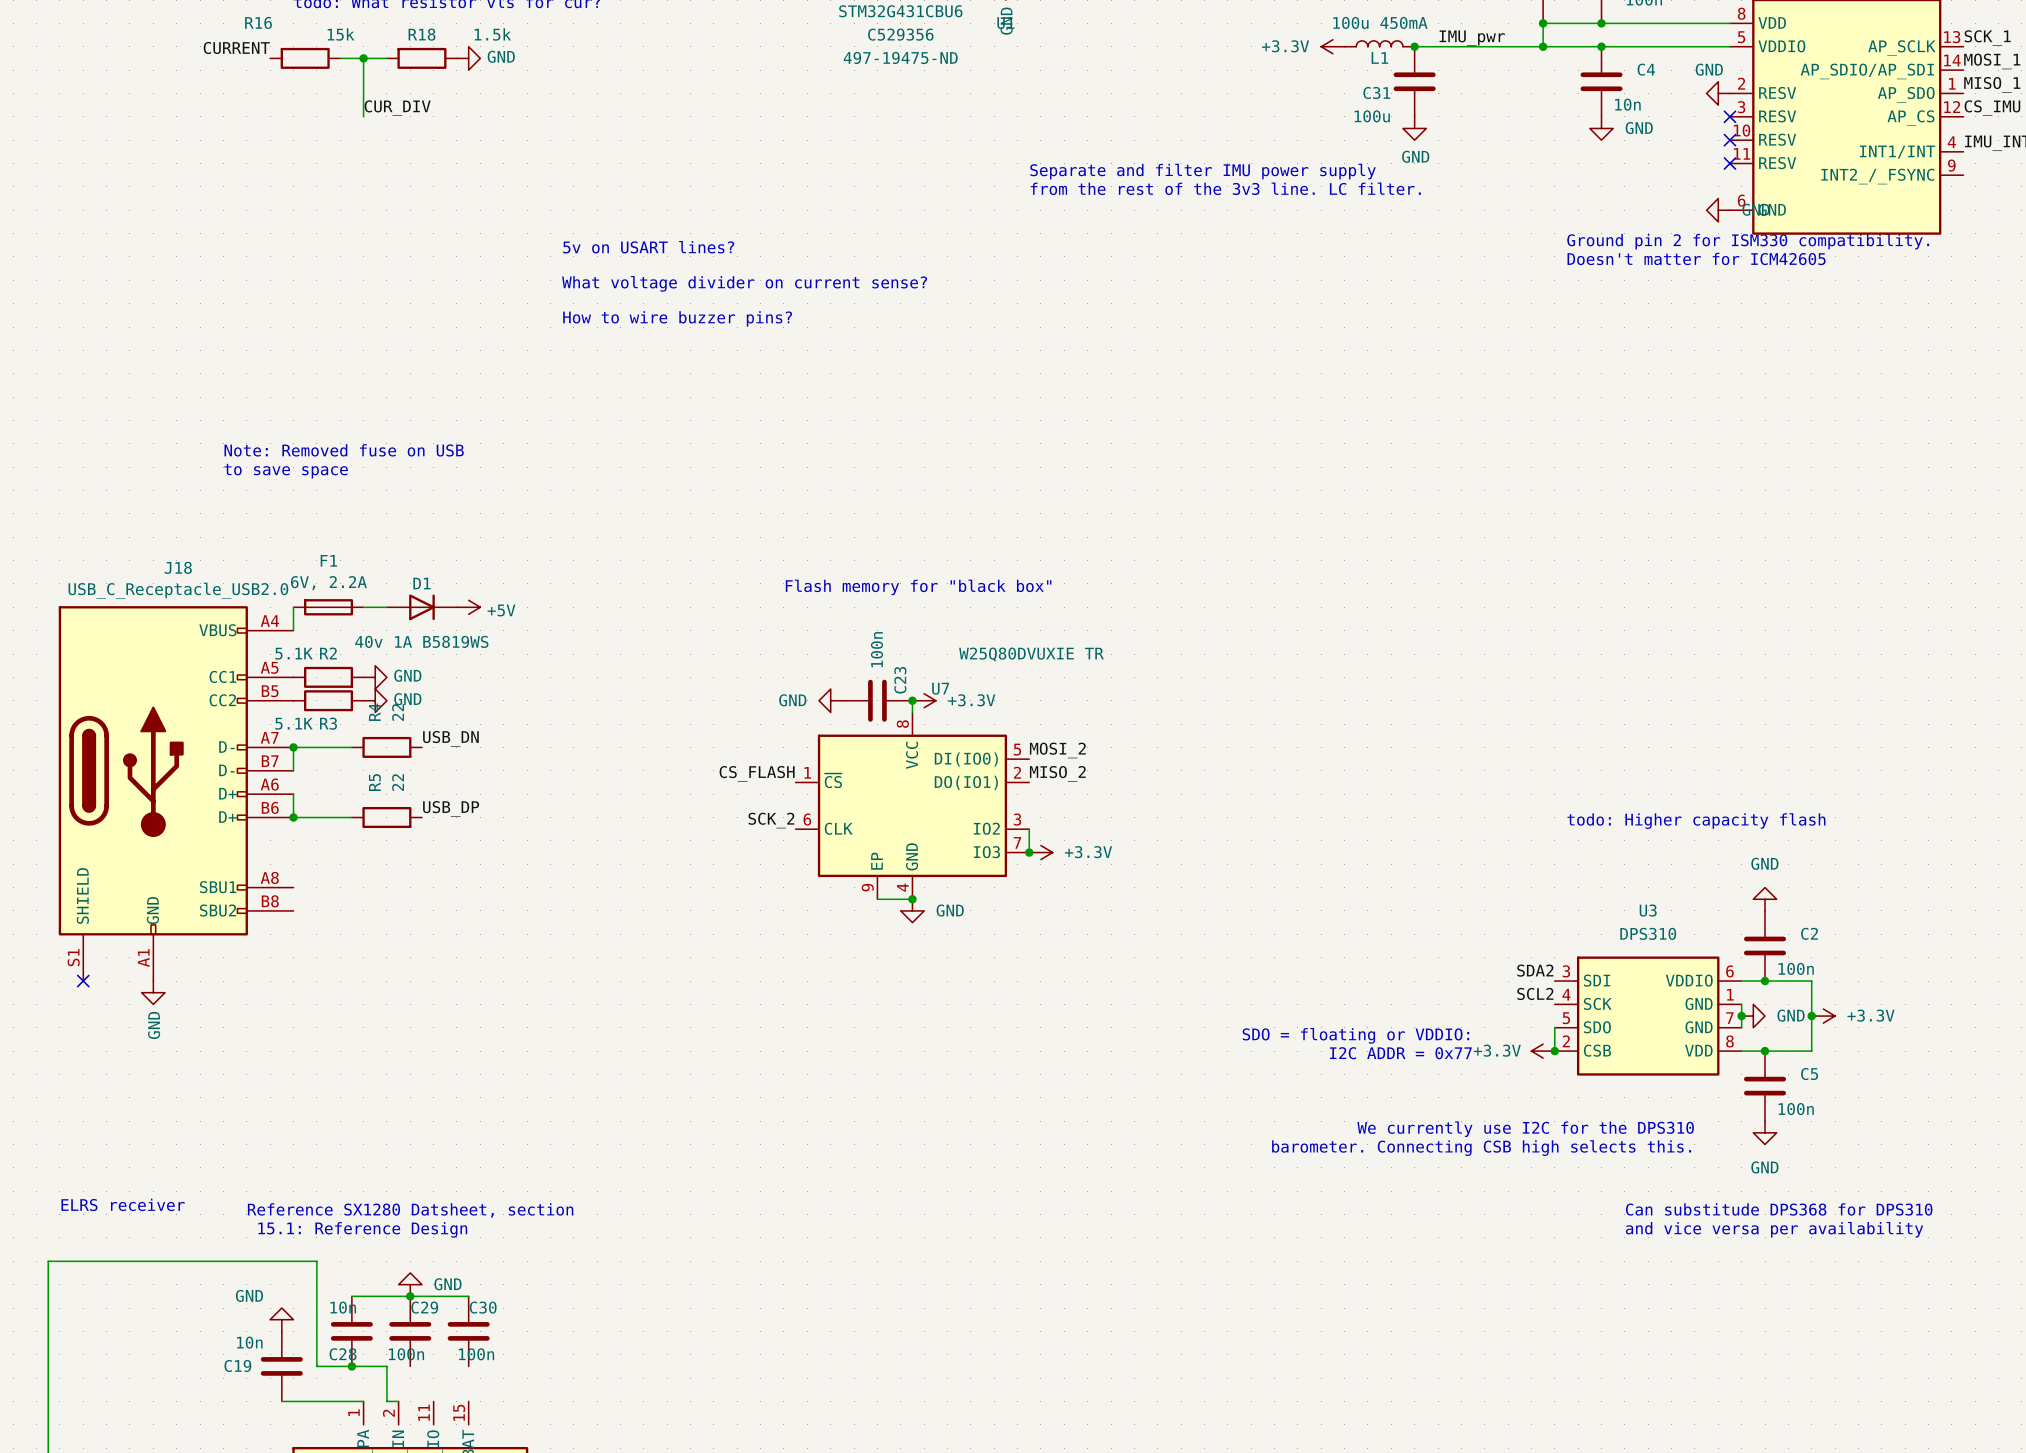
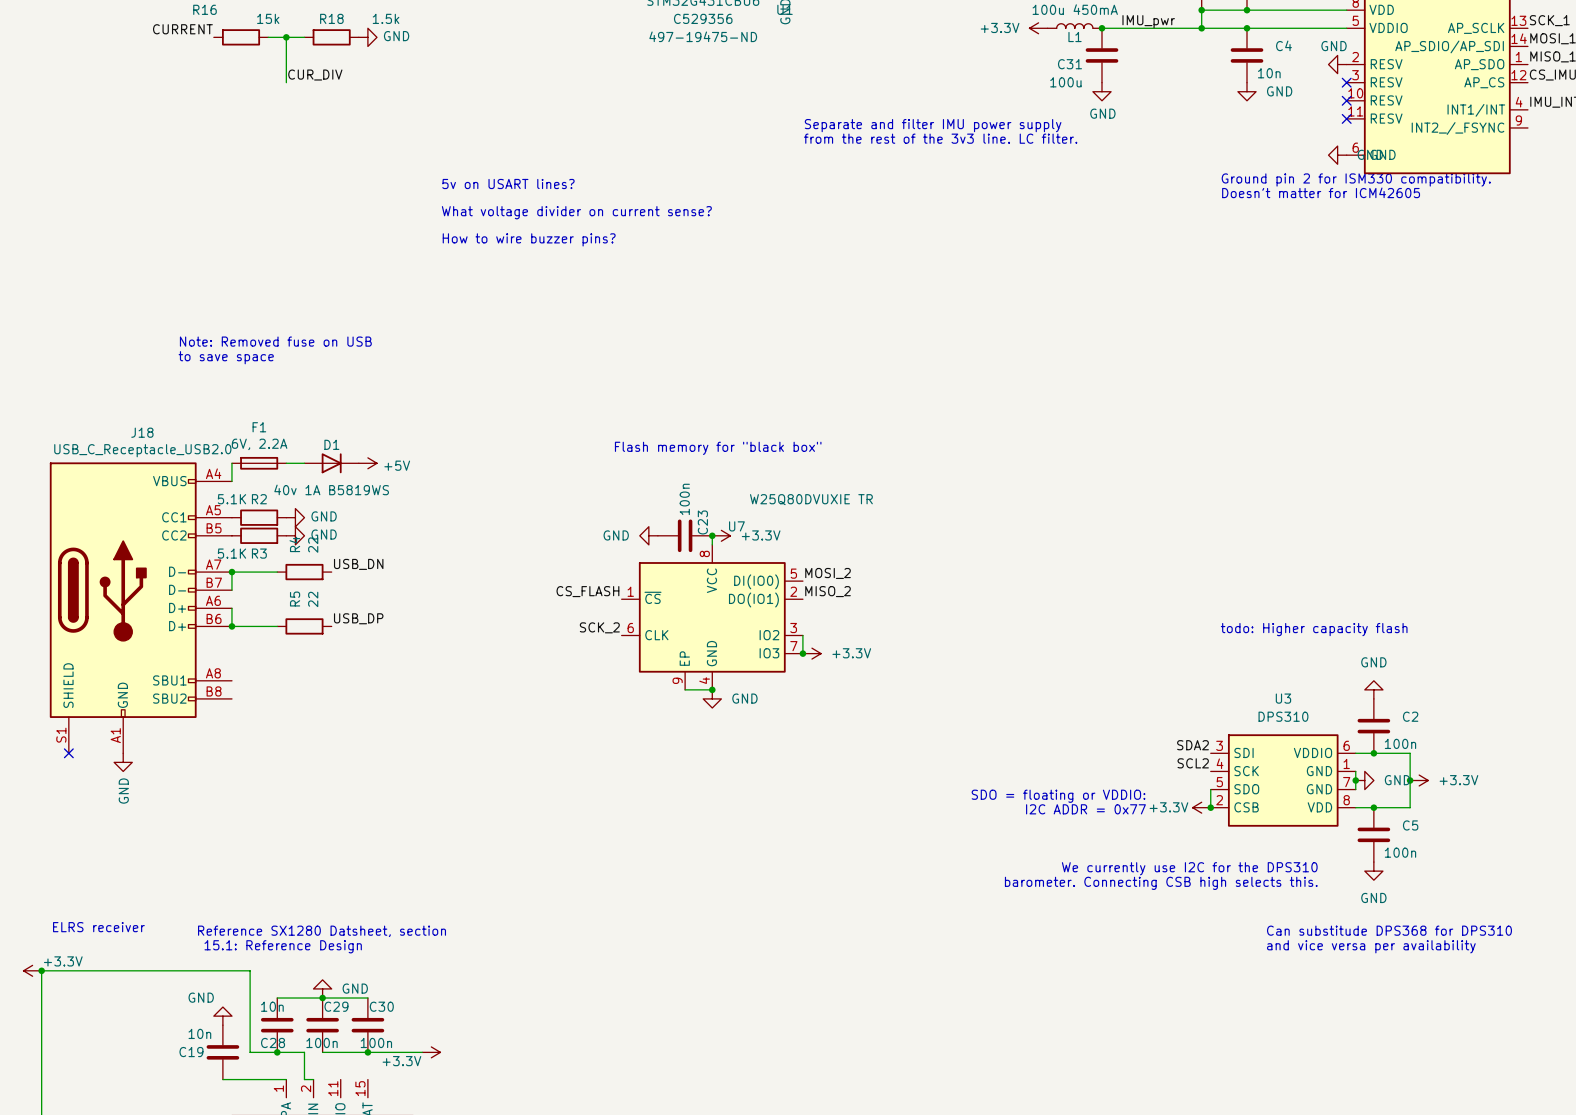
power symbol: none -> +3.3V (32, 970)
junction: none -> (41, 970)
wire: none -> (322, 1052) (422, 1052)
junction: none -> (367, 1052)
power symbol: none -> +3.3V (431, 1052)

